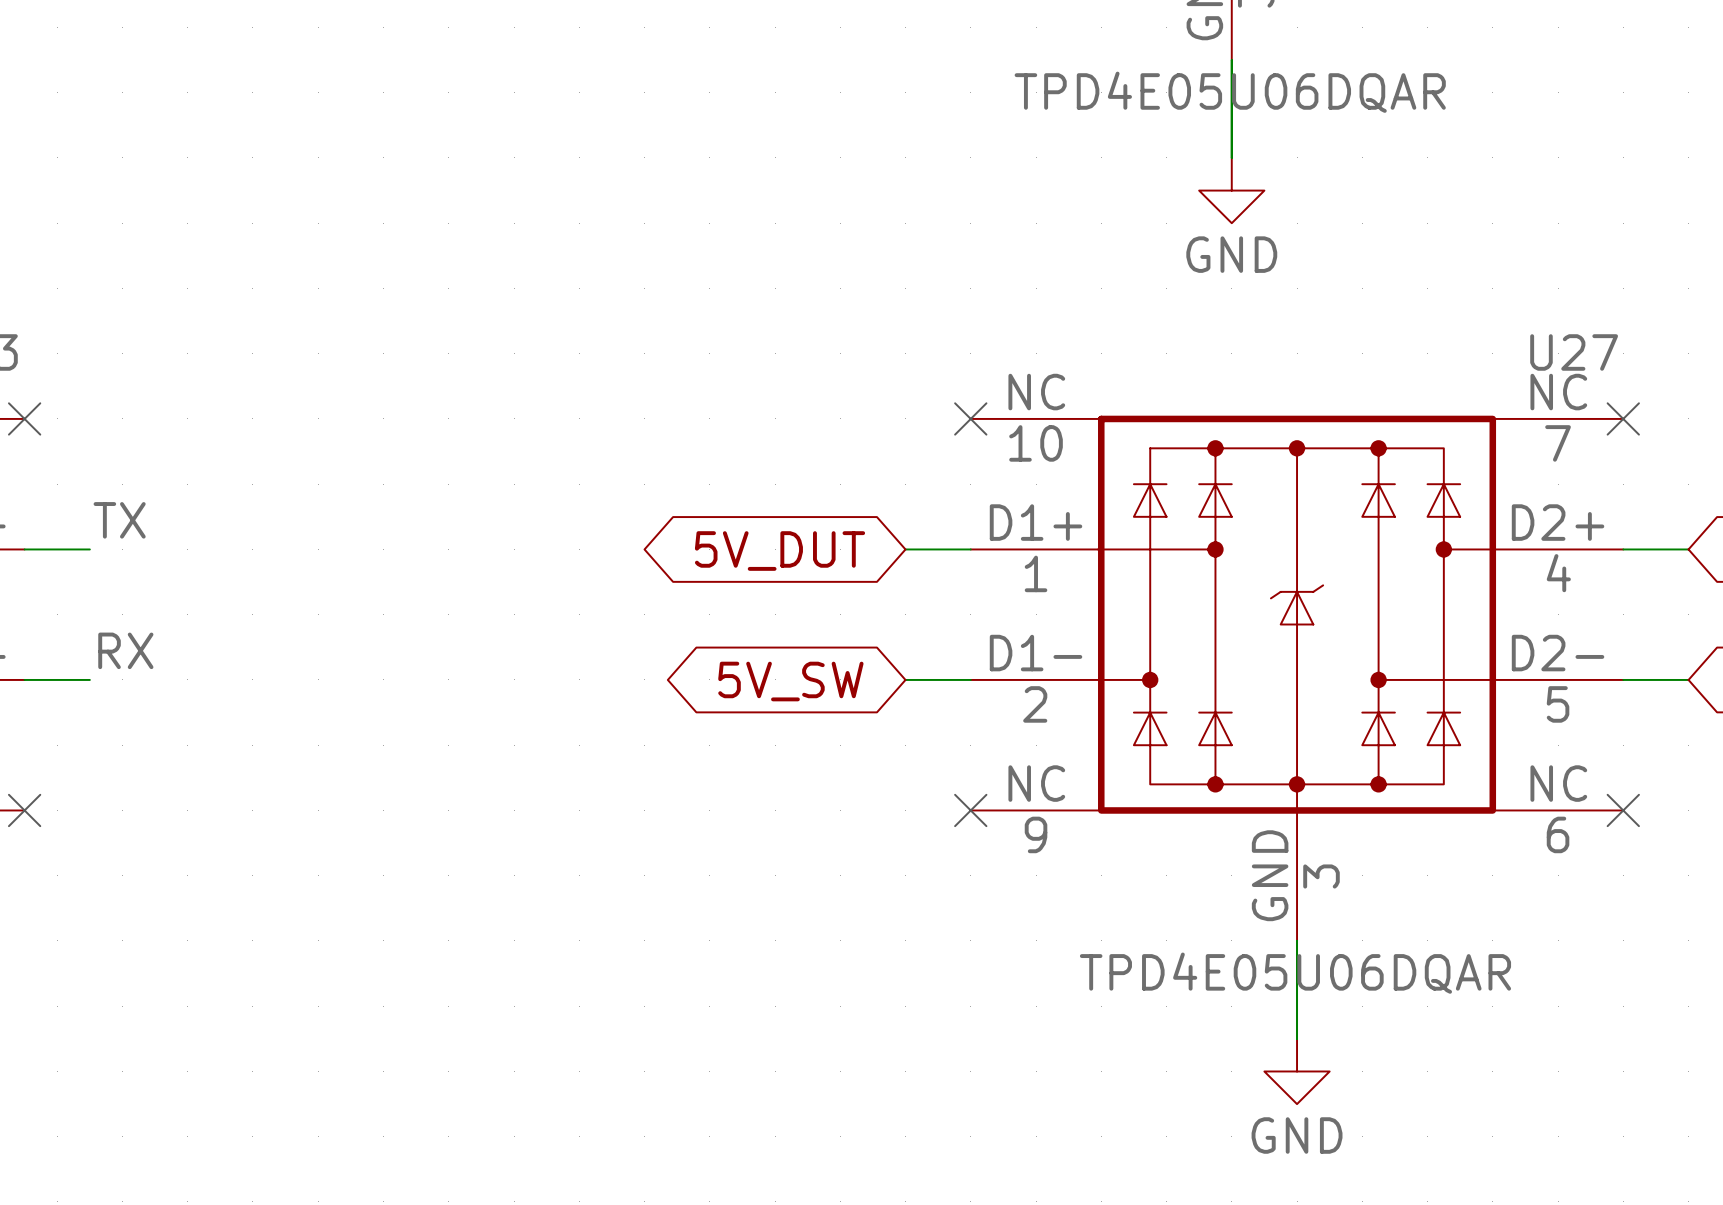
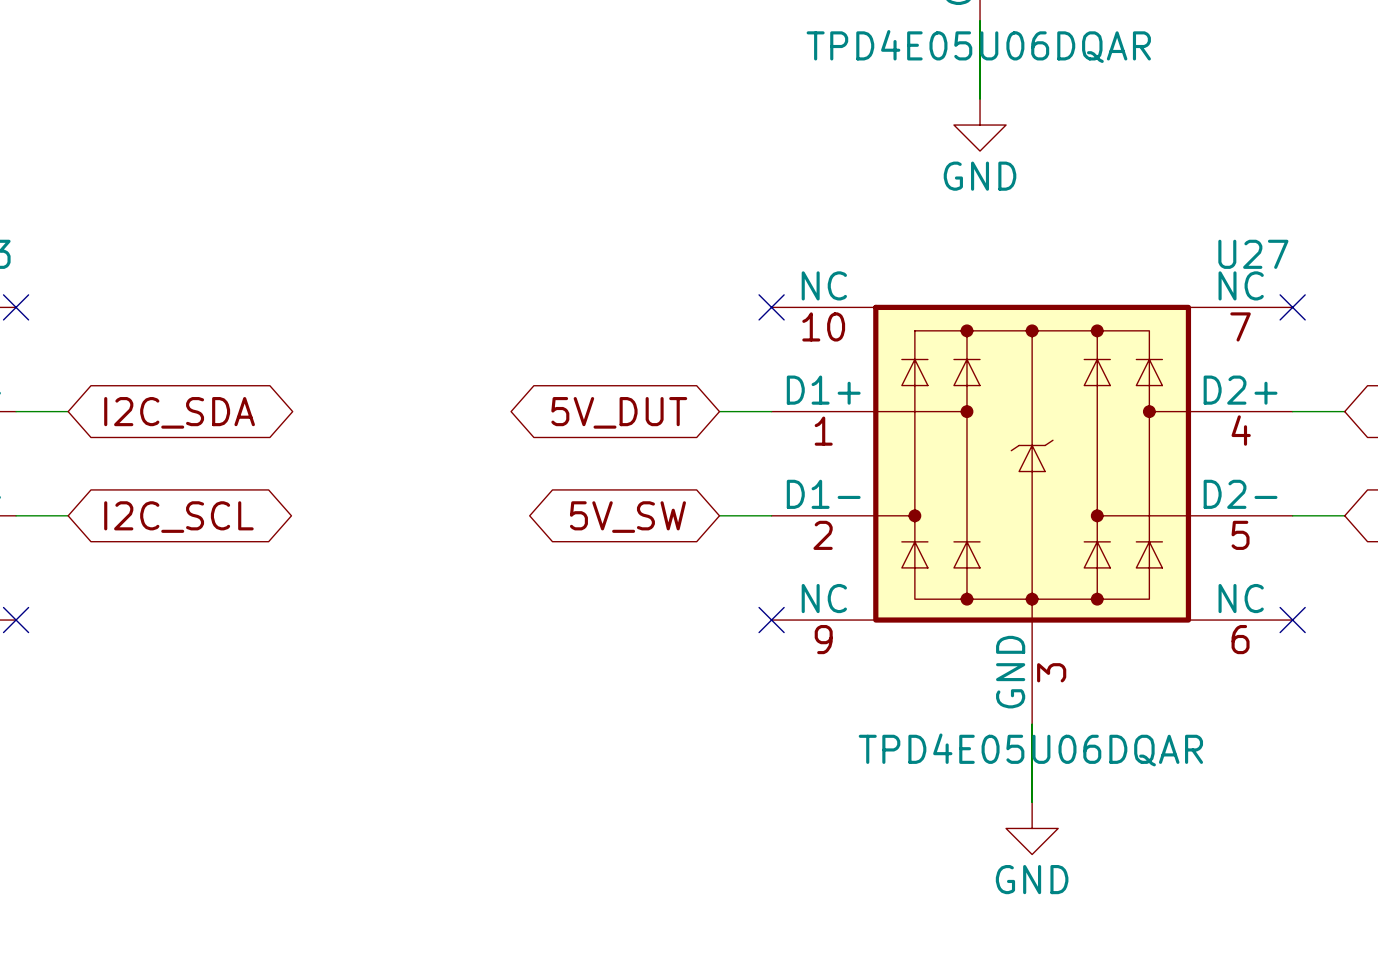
label: TX (119, 520) -> none
global label: none -> I2C_SDA (179, 412)
label: RX (125, 650) -> none
global label: none -> I2C_SCL (178, 517)

